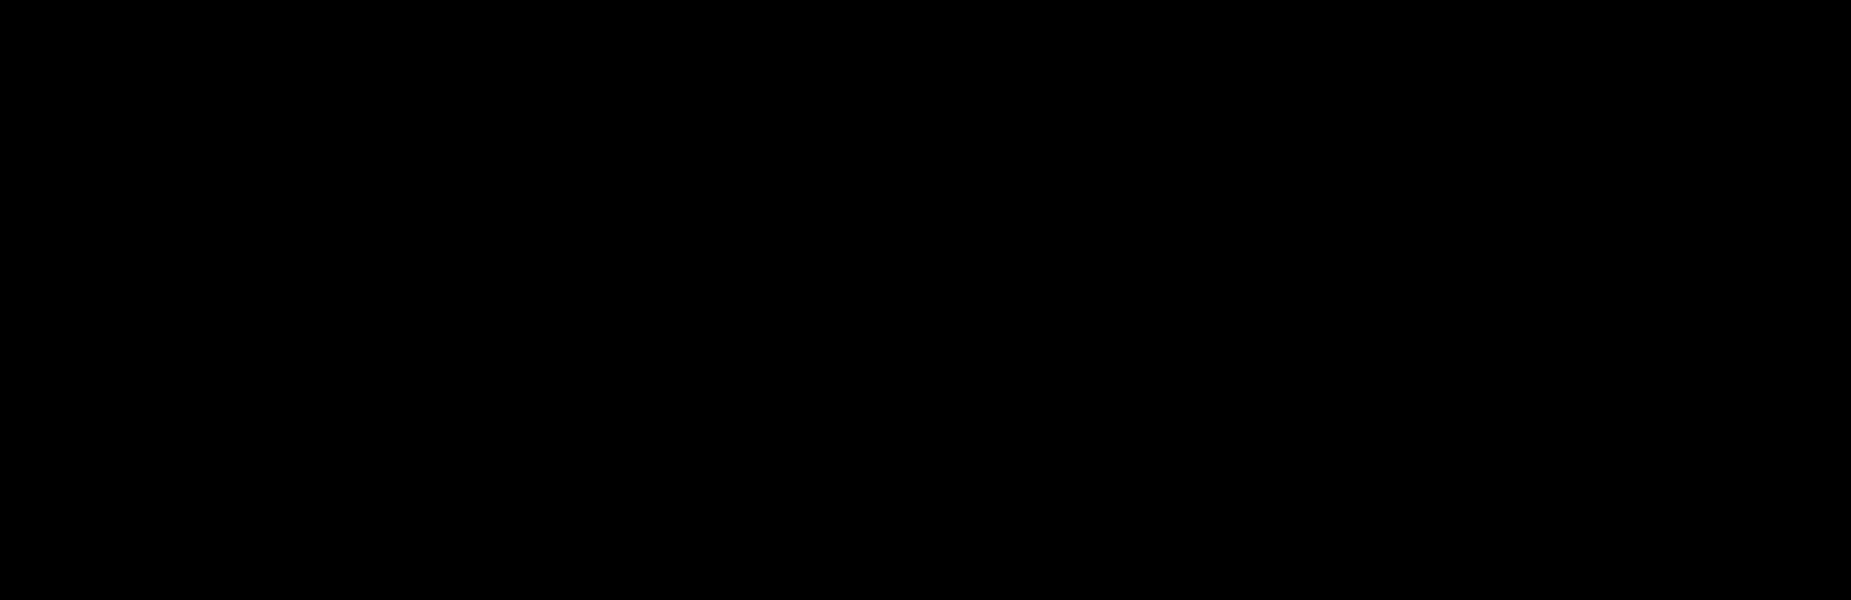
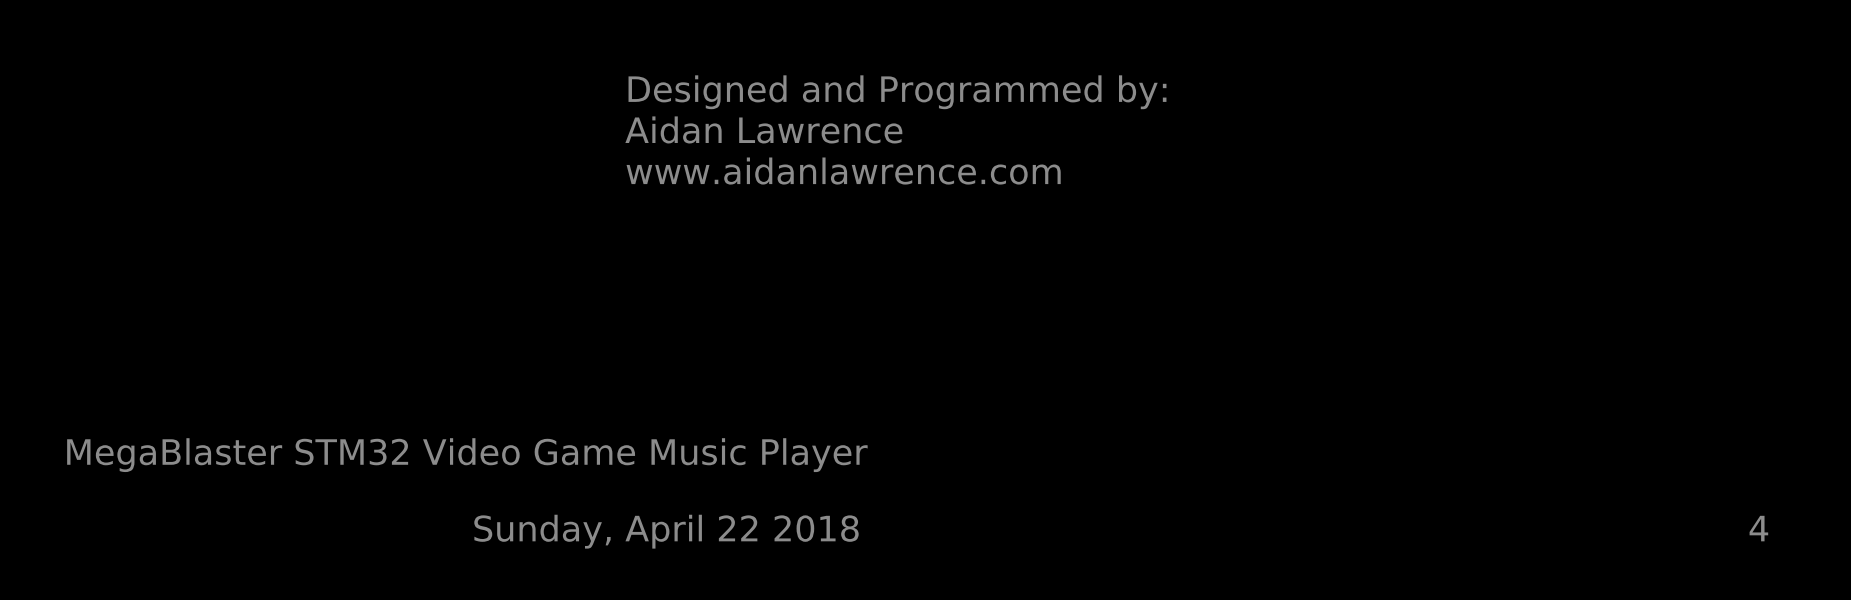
text: none -> Designed and Programmed by: (897, 92)
text: none -> Aidan Lawrence (763, 129)
text: none -> www.aidanlawrence.com (843, 171)
text: none -> MegaBlaster STM32 Video Game Music Player (467, 455)
text: none -> 4 (1758, 528)
text: none -> Sunday, April 22 2018 (666, 531)

